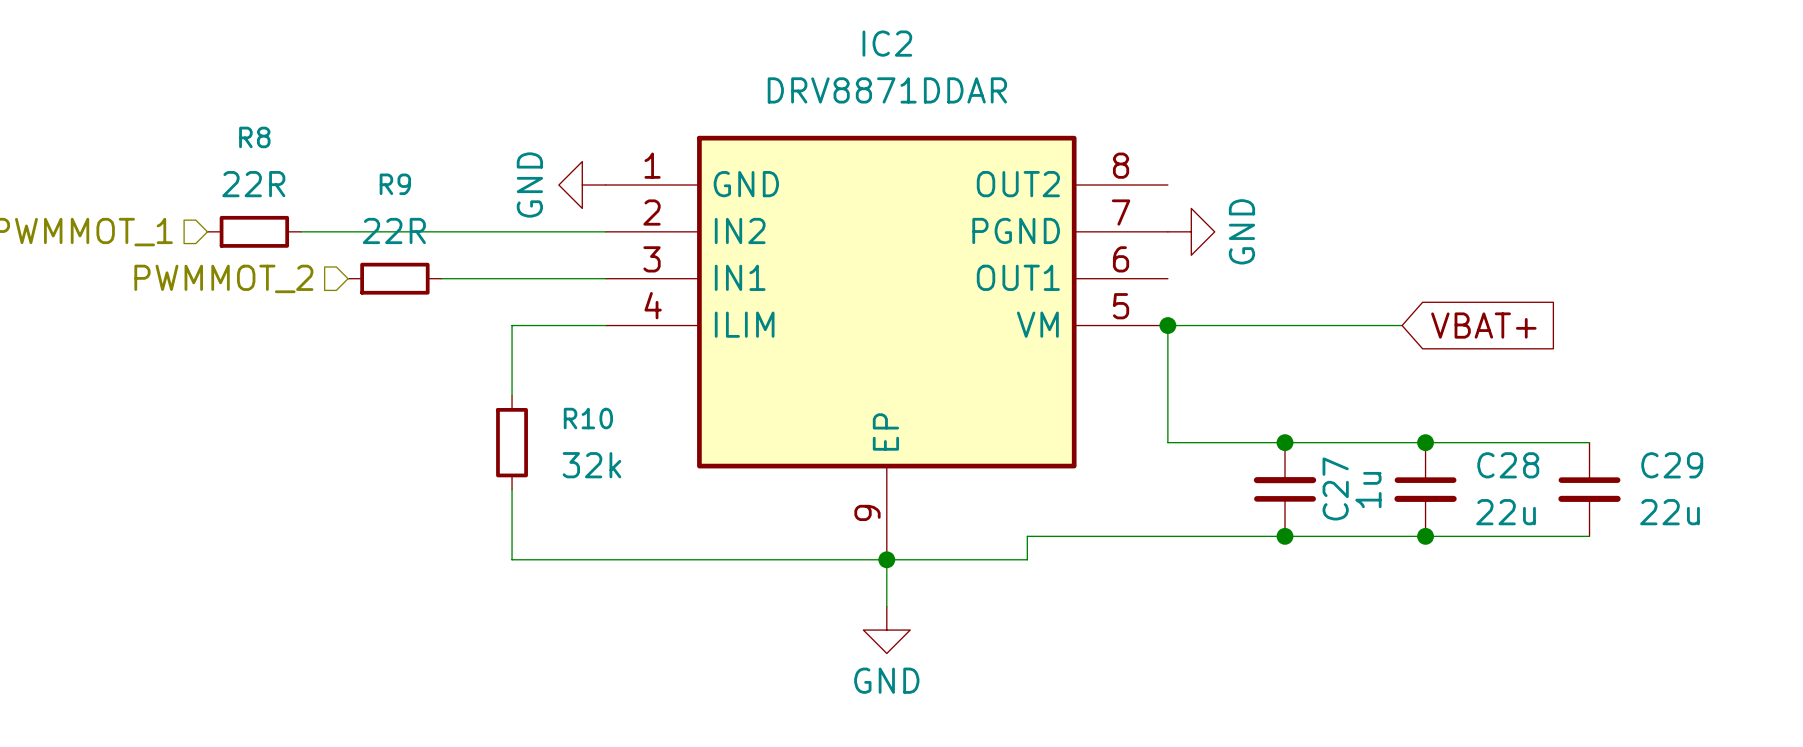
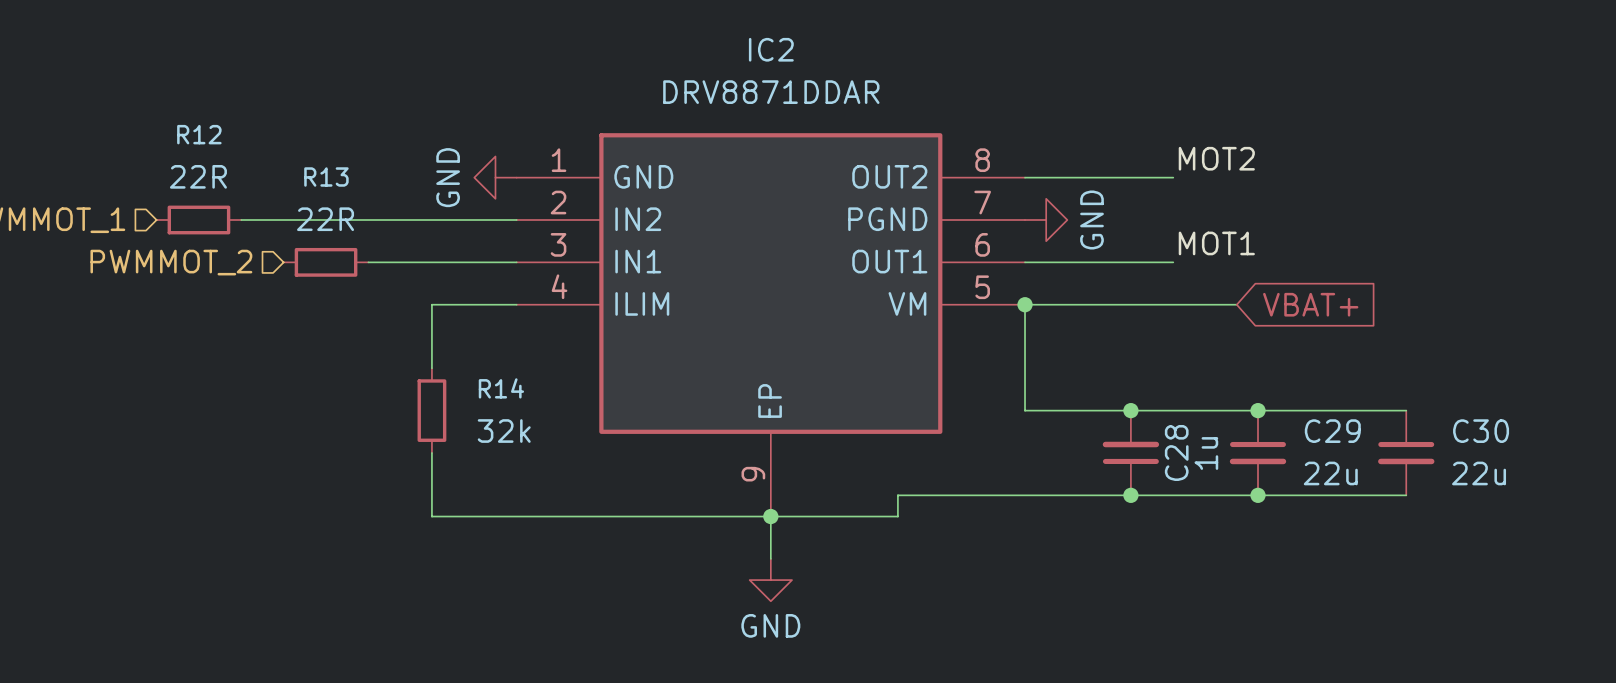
R8 name: R8 (254, 137) -> R12 (199, 134)
label: none -> MOT2 (1216, 158)
R9 name: R9 (395, 184) -> R13 (326, 177)
wire: none -> (1025, 177) (1173, 177)
label: none -> MOT1 (1216, 243)
wire: none -> (1025, 262) (1173, 262)
R10 name: R10 (588, 418) -> R14 (501, 388)
C28 name: C28 (1508, 465) -> C29 (1332, 431)
C29 name: C29 (1672, 465) -> C30 (1481, 431)
C27 name: C27 (1335, 488) -> C28 (1176, 452)

